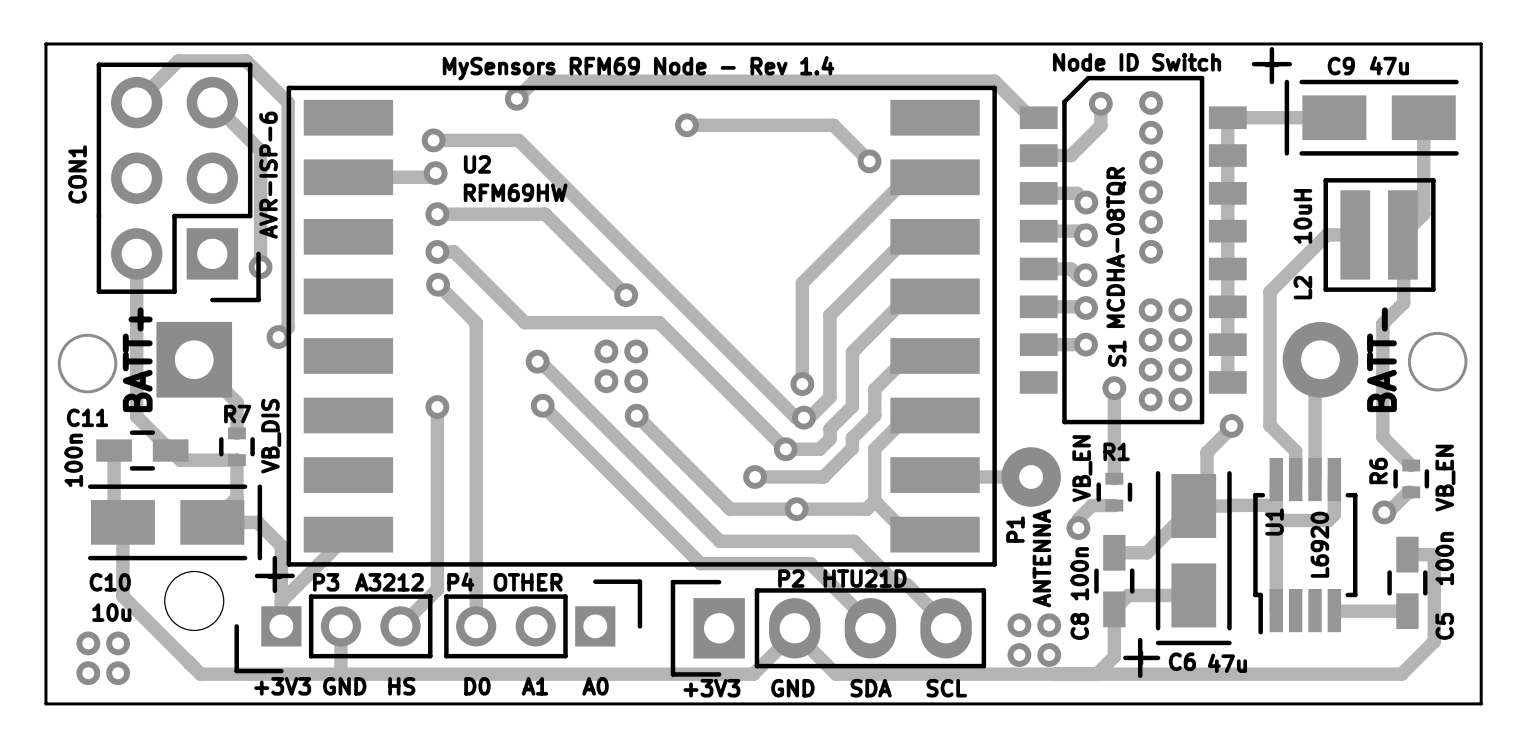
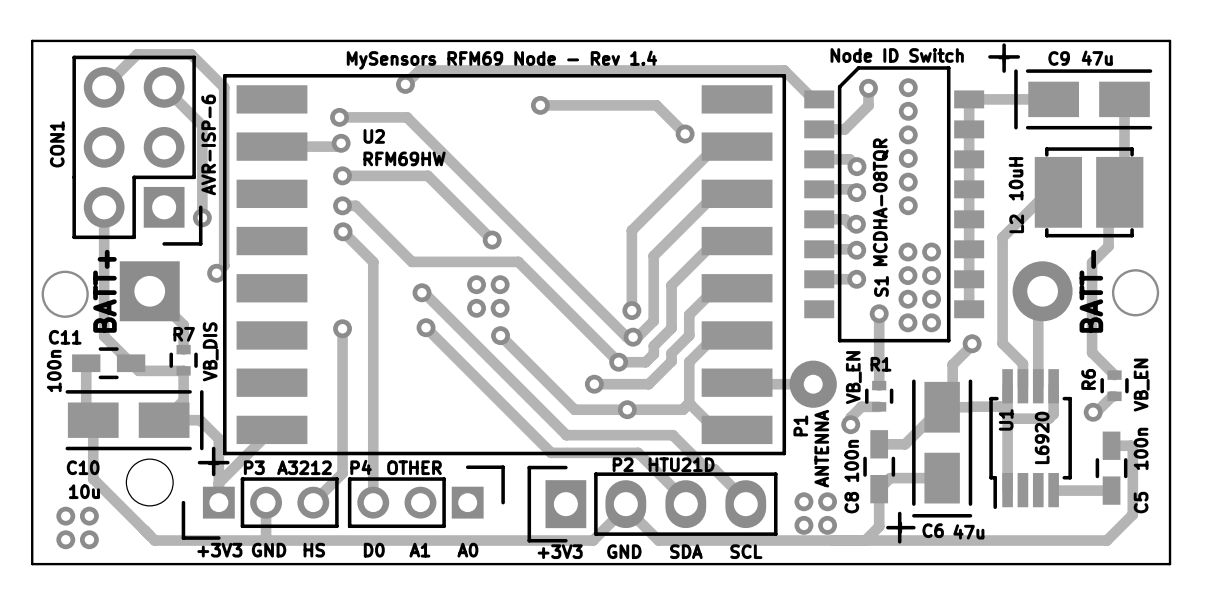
L2 footprint: [1323, 178, 1436, 292] -> [1034, 147, 1144, 238]

